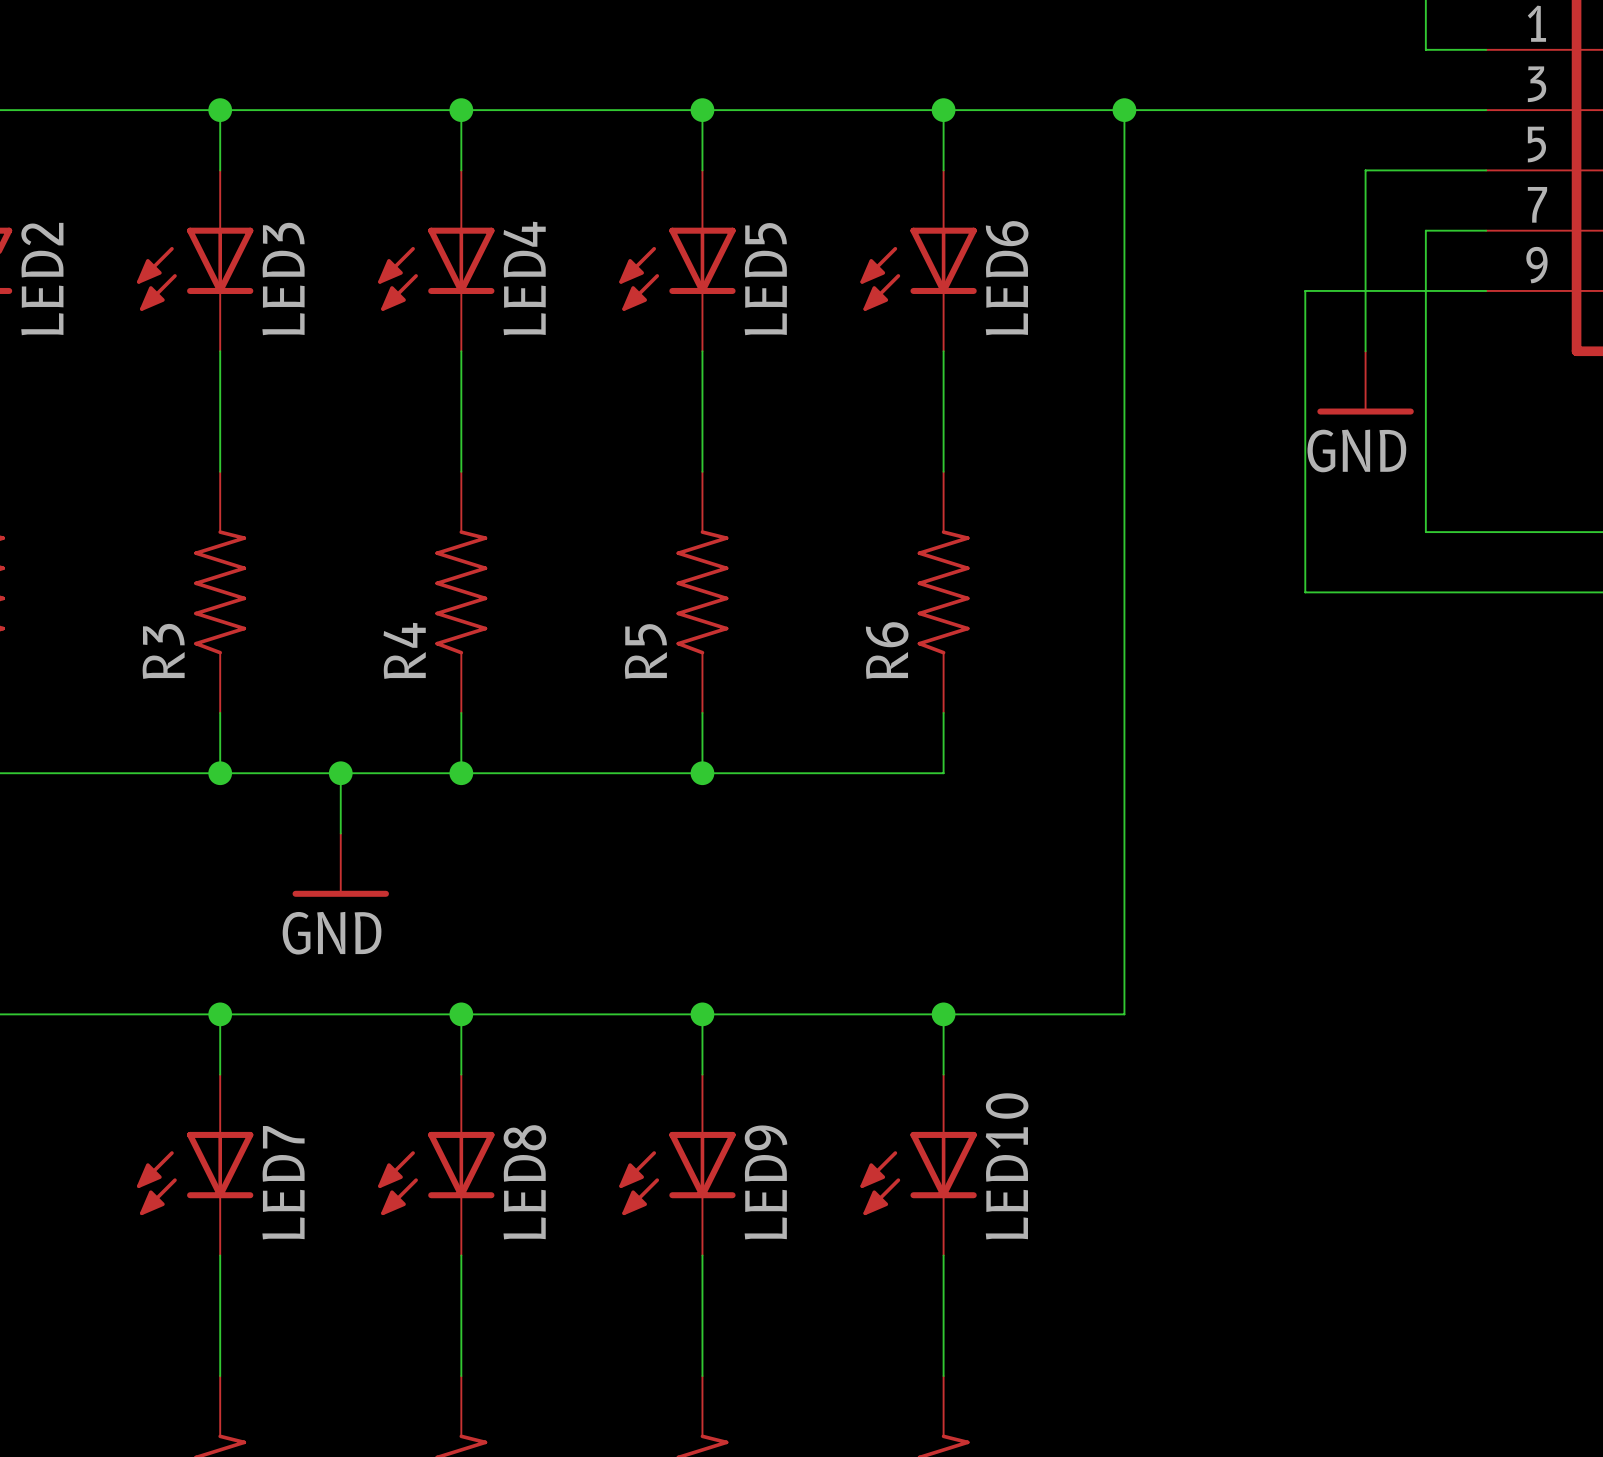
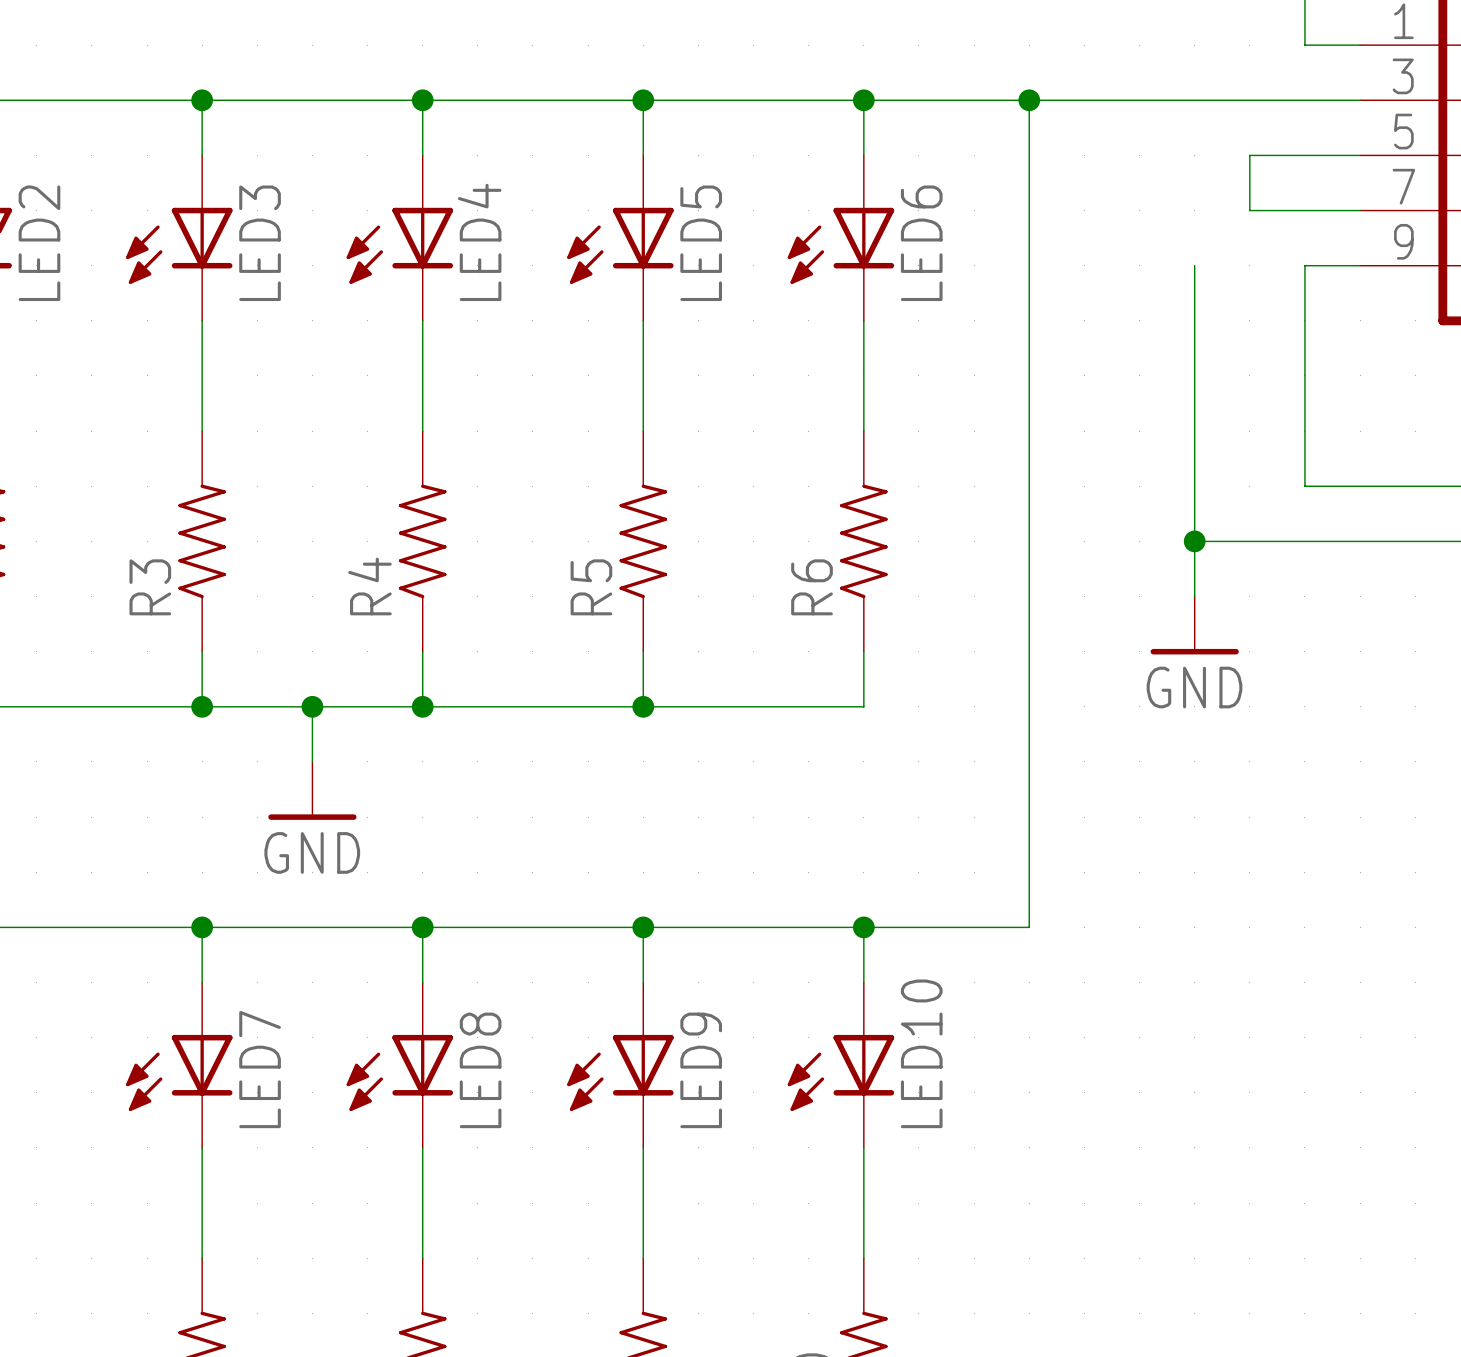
wire: (1365, 230) (1365, 351) -> none
wire: (1425, 230) (1425, 290) (1305, 290) -> (1304, 210) (1249, 210)
power symbol position: GND (1365, 382) -> GND (1194, 625)
wire: none -> (1194, 541) (1194, 596)
junction: none -> (1194, 541)

